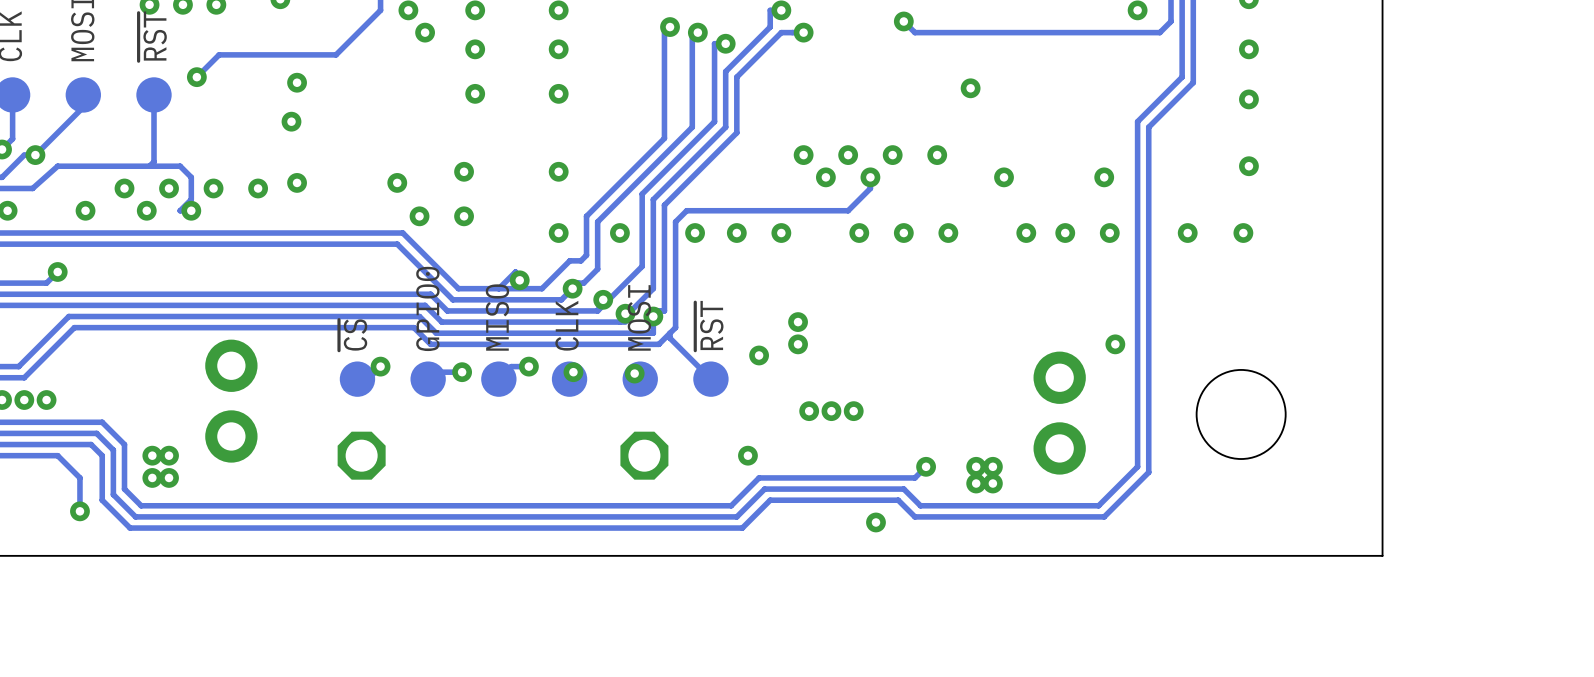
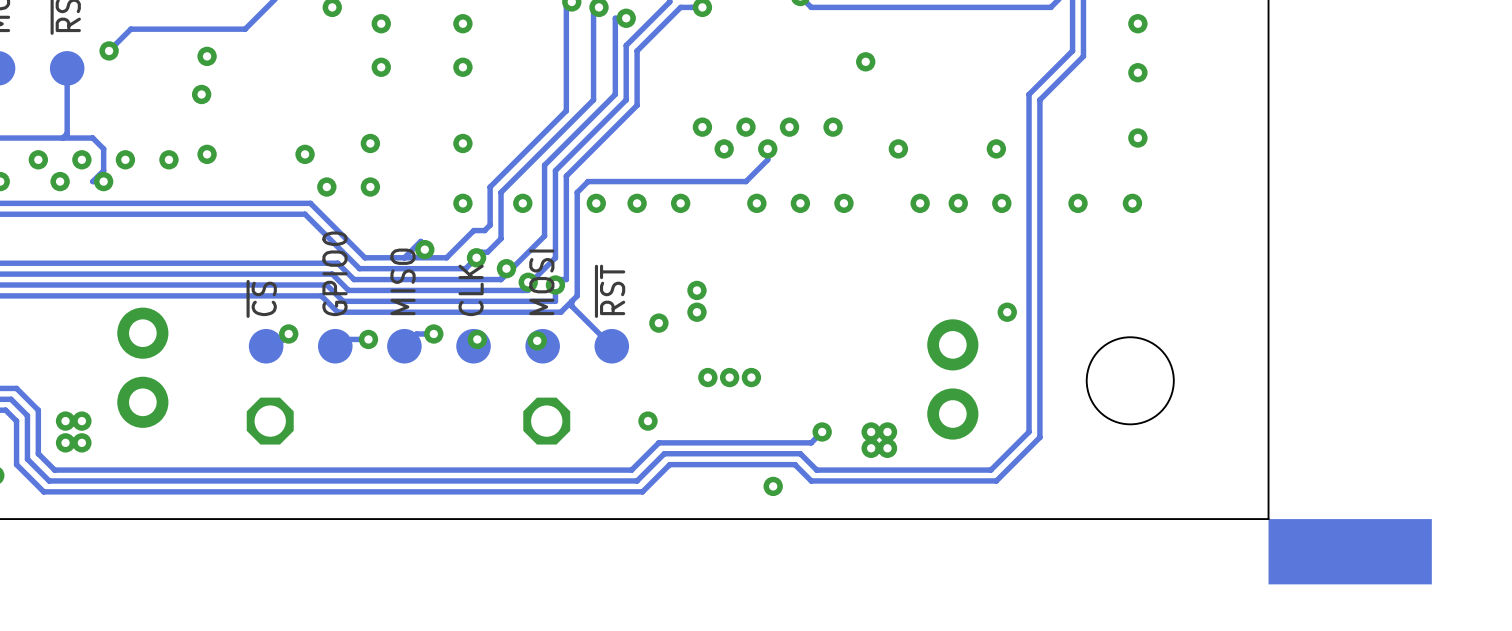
drawing: none -> [1268, 519, 1432, 585]

